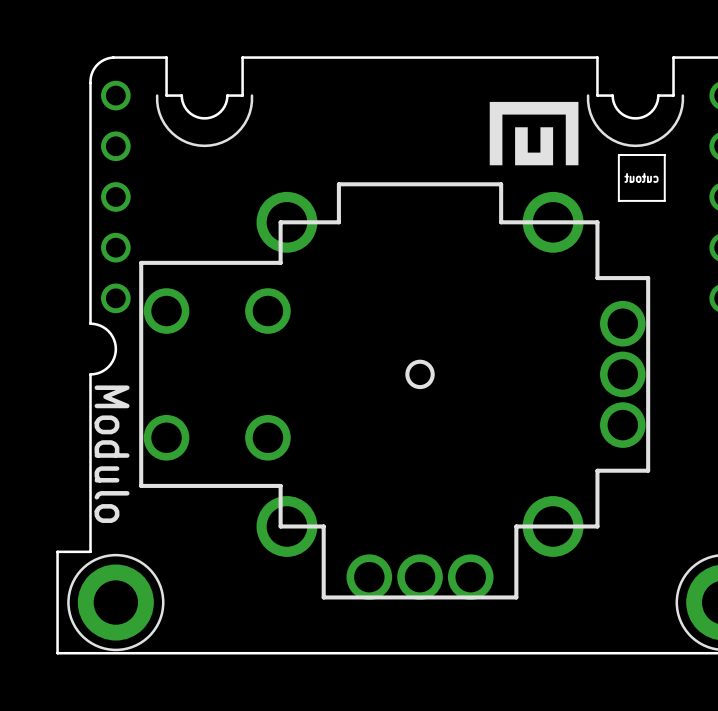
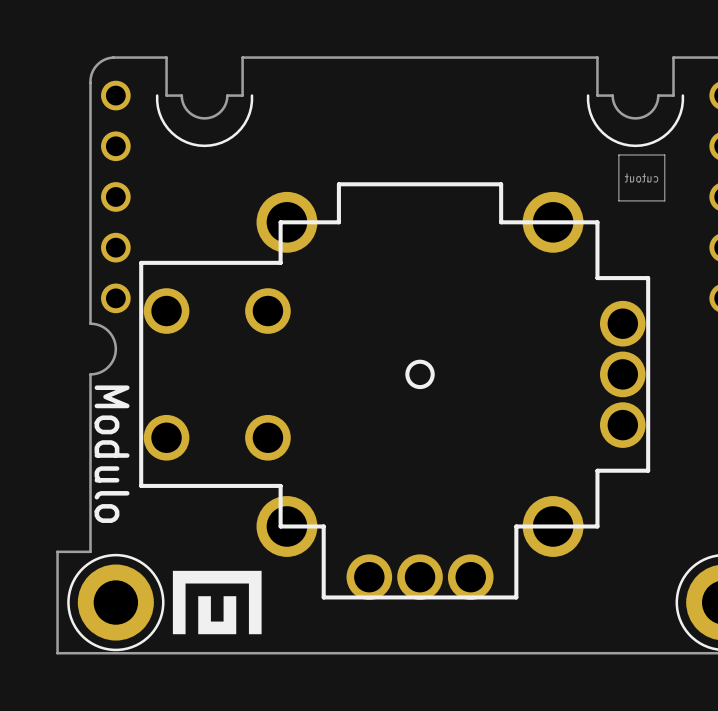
drawing: [489, 101, 579, 166] -> none
drawing: none -> [172, 570, 262, 635]

